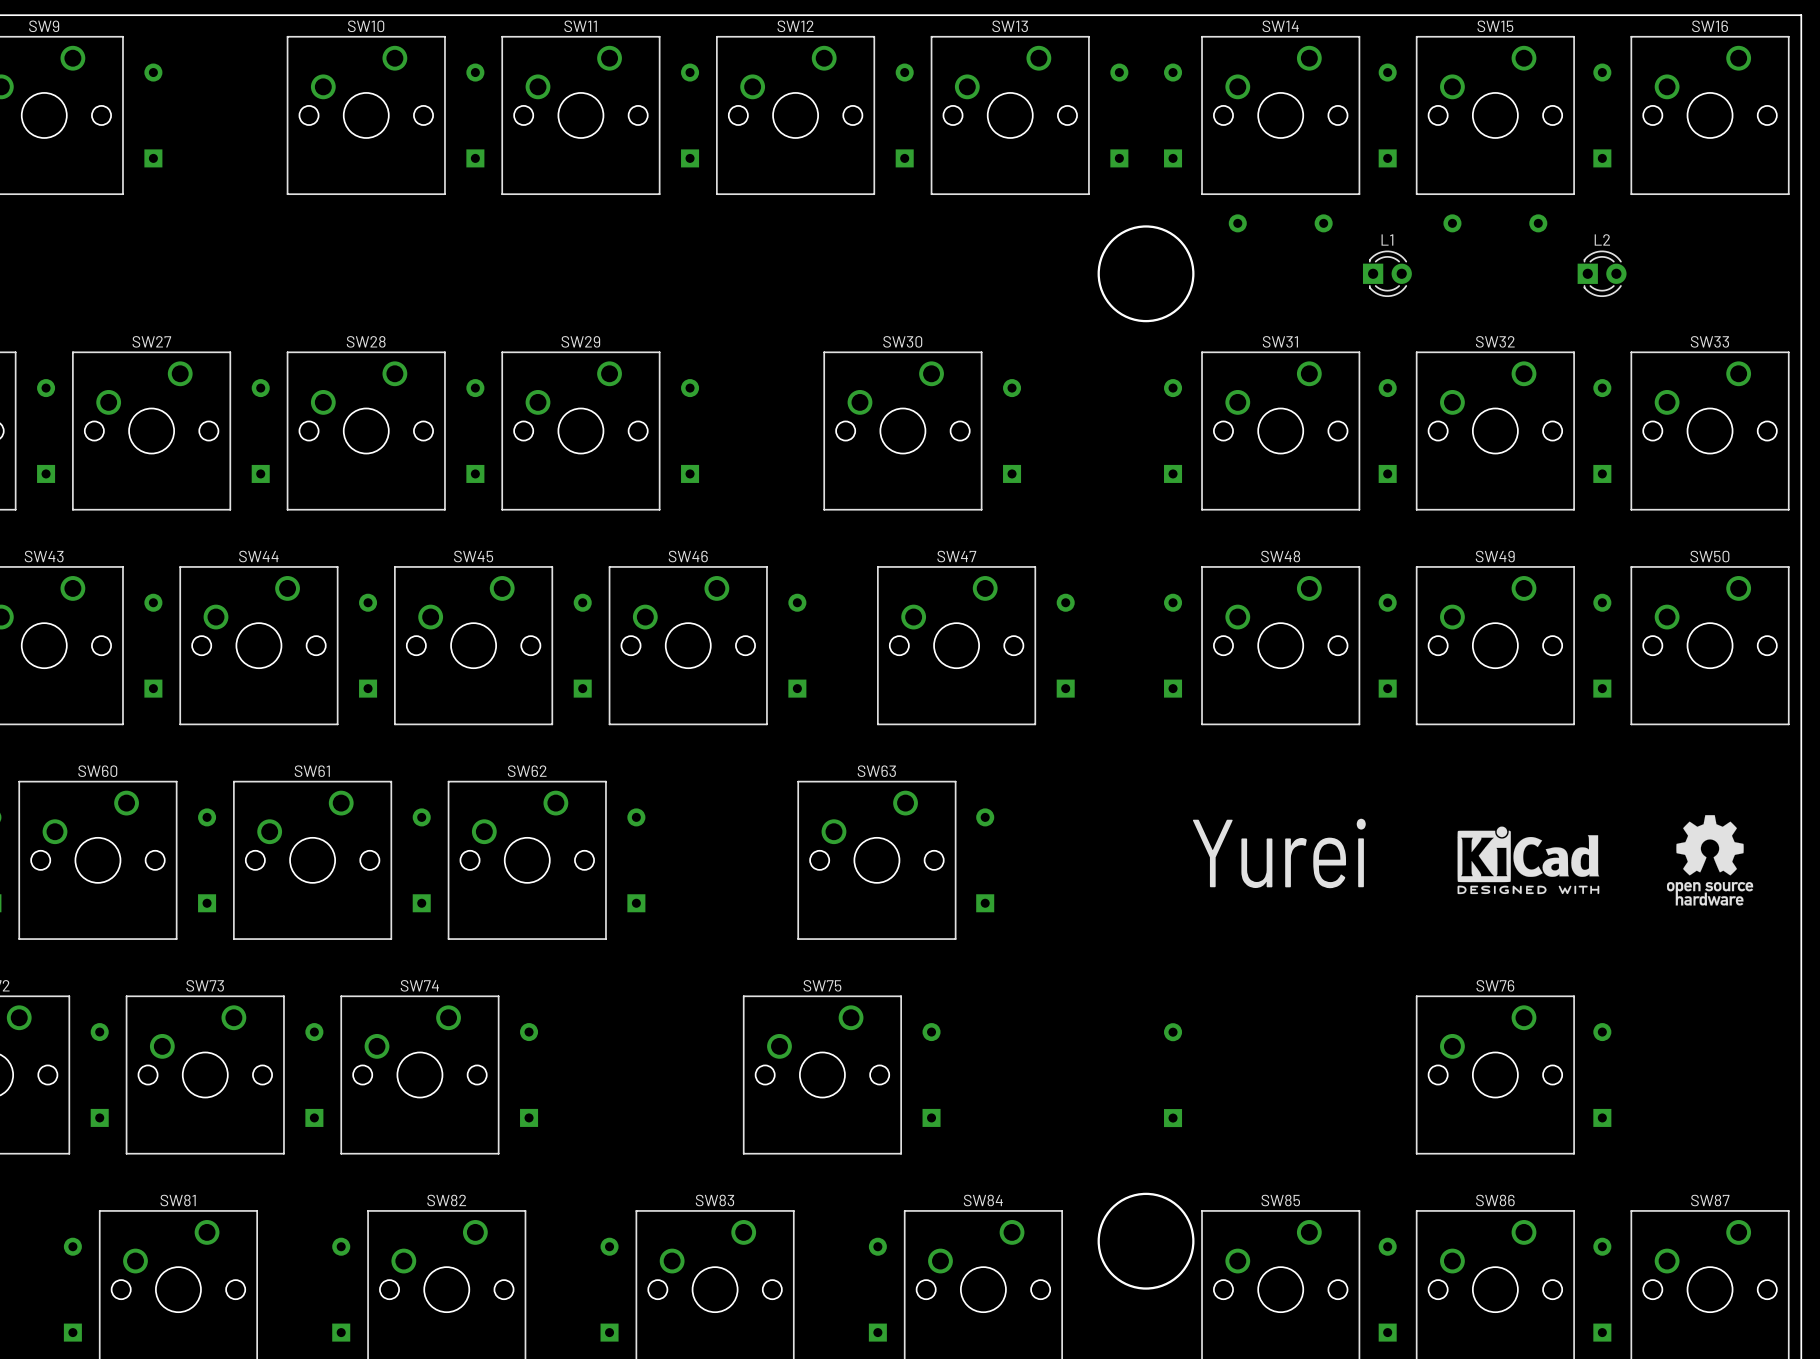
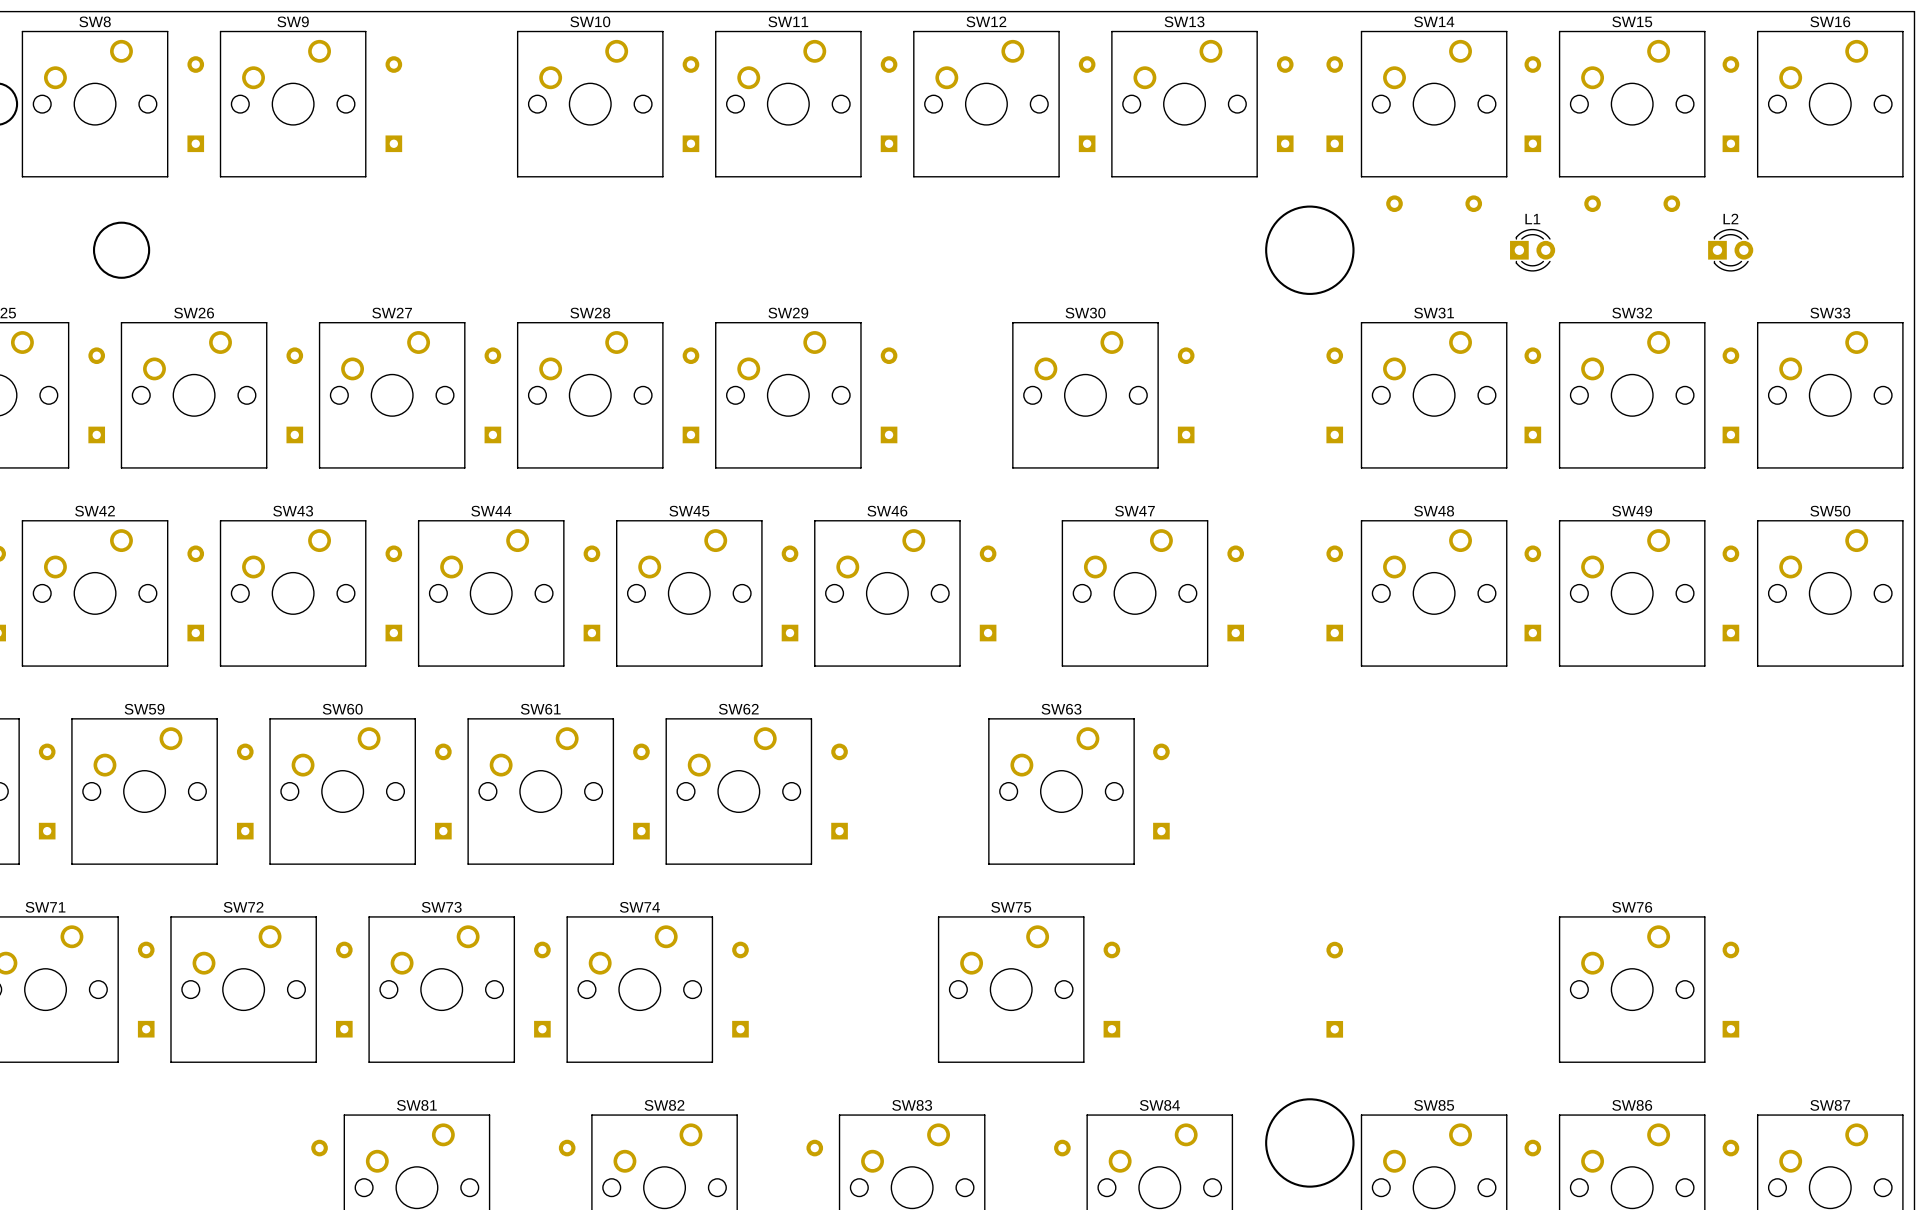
drawing: [1666, 815, 1754, 906] -> none
drawing: [1457, 826, 1600, 895] -> none
text: Yurei (1279, 853) -> none

